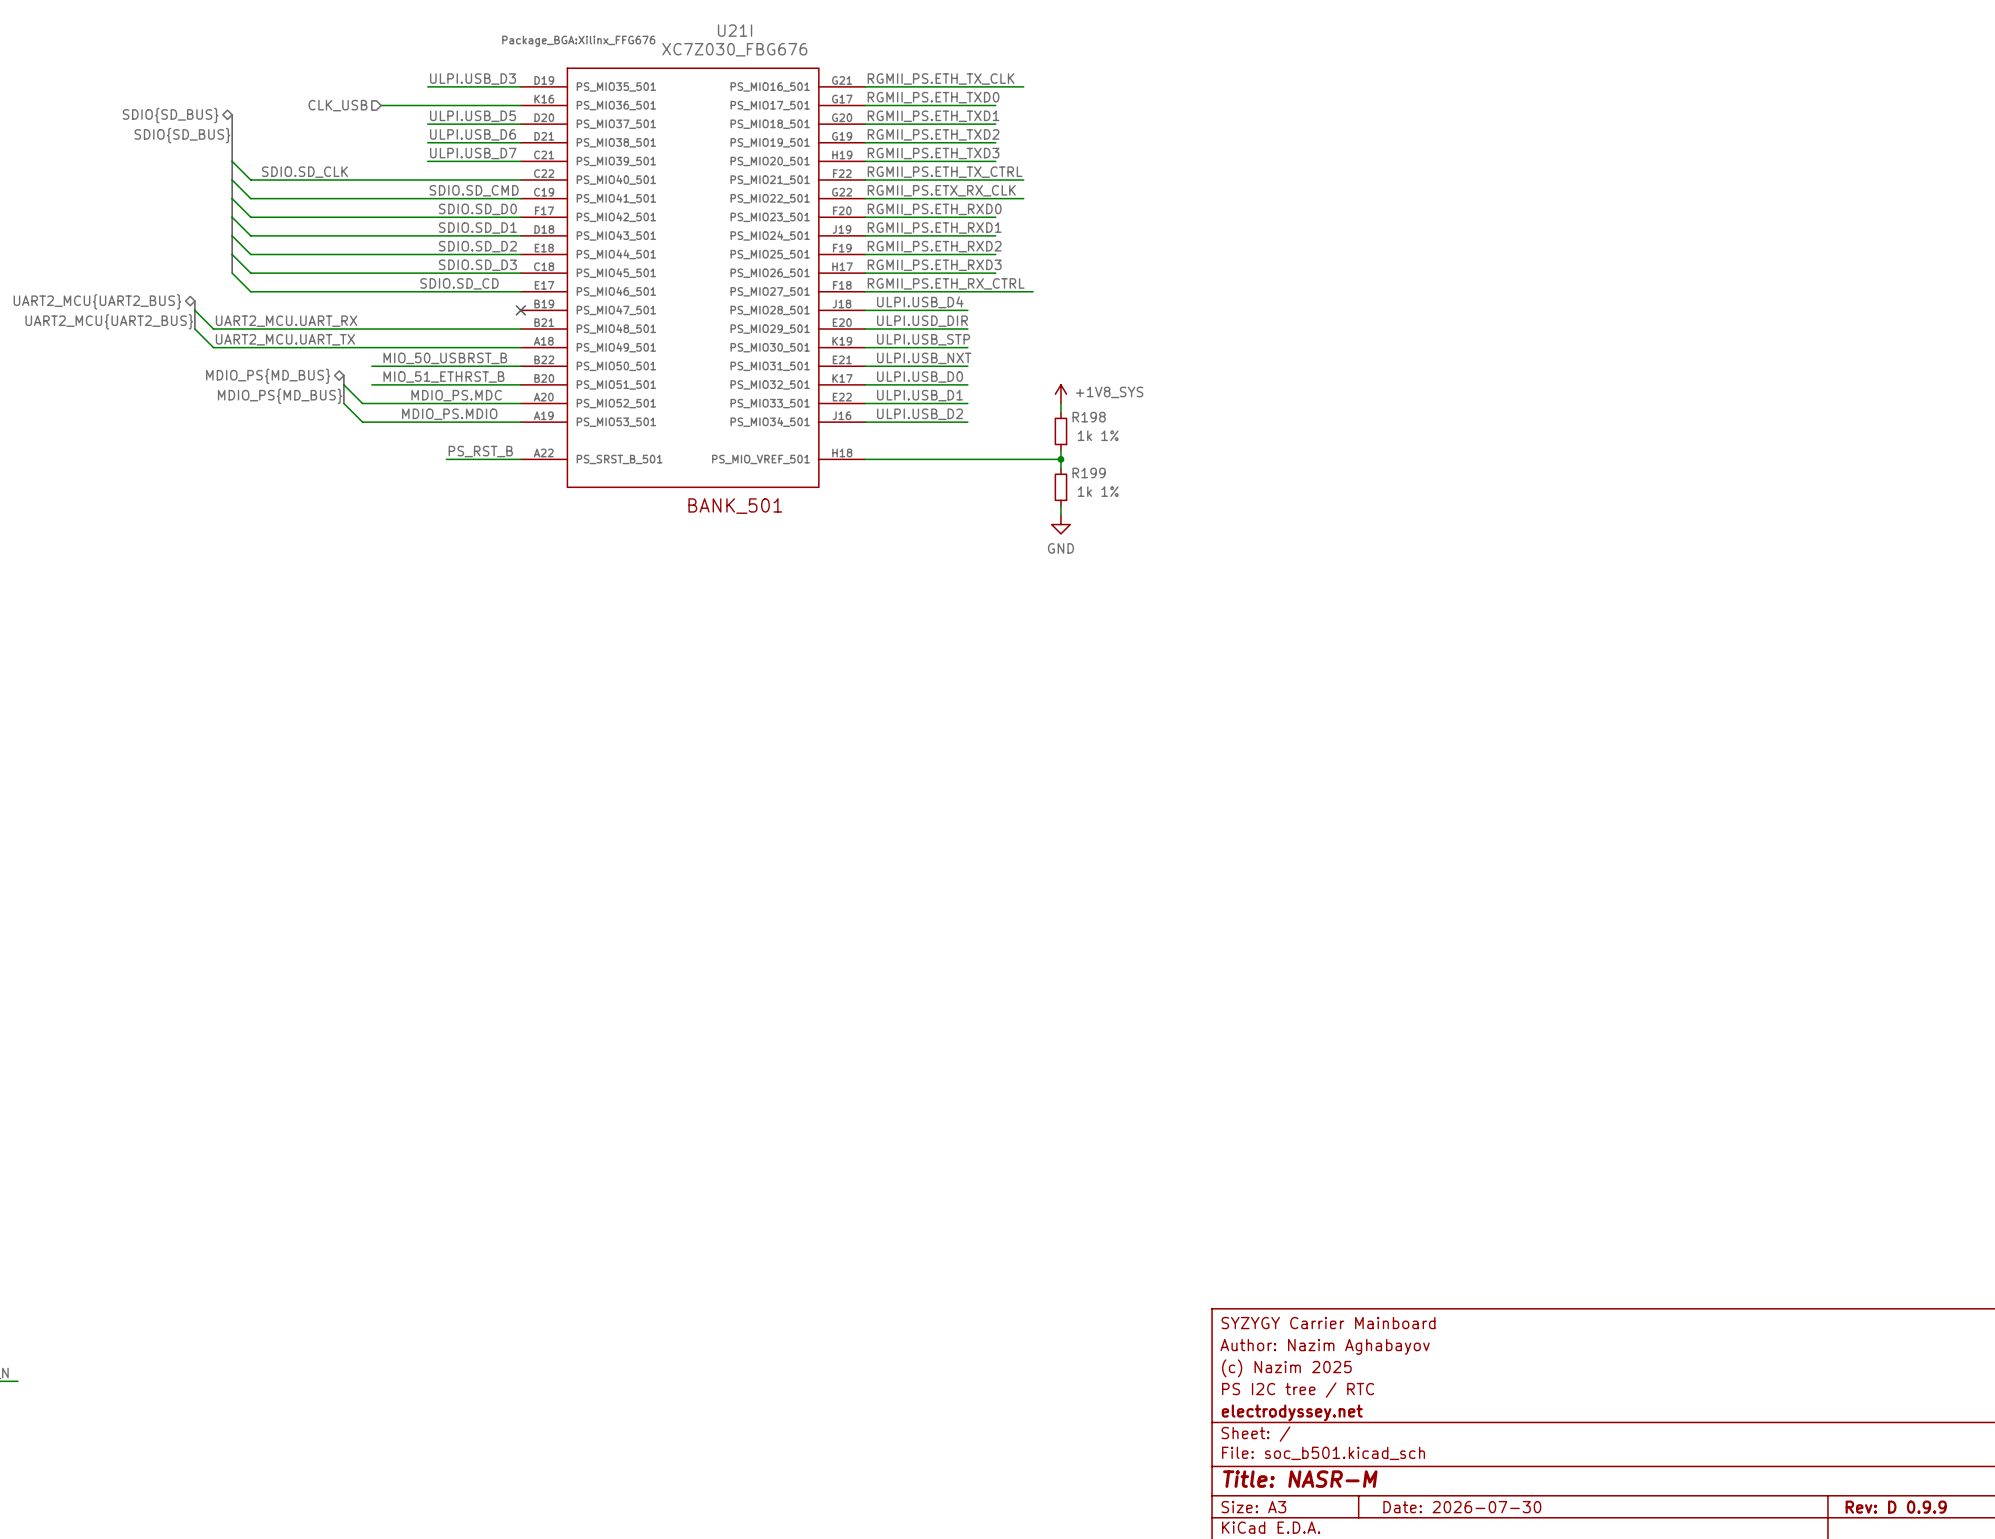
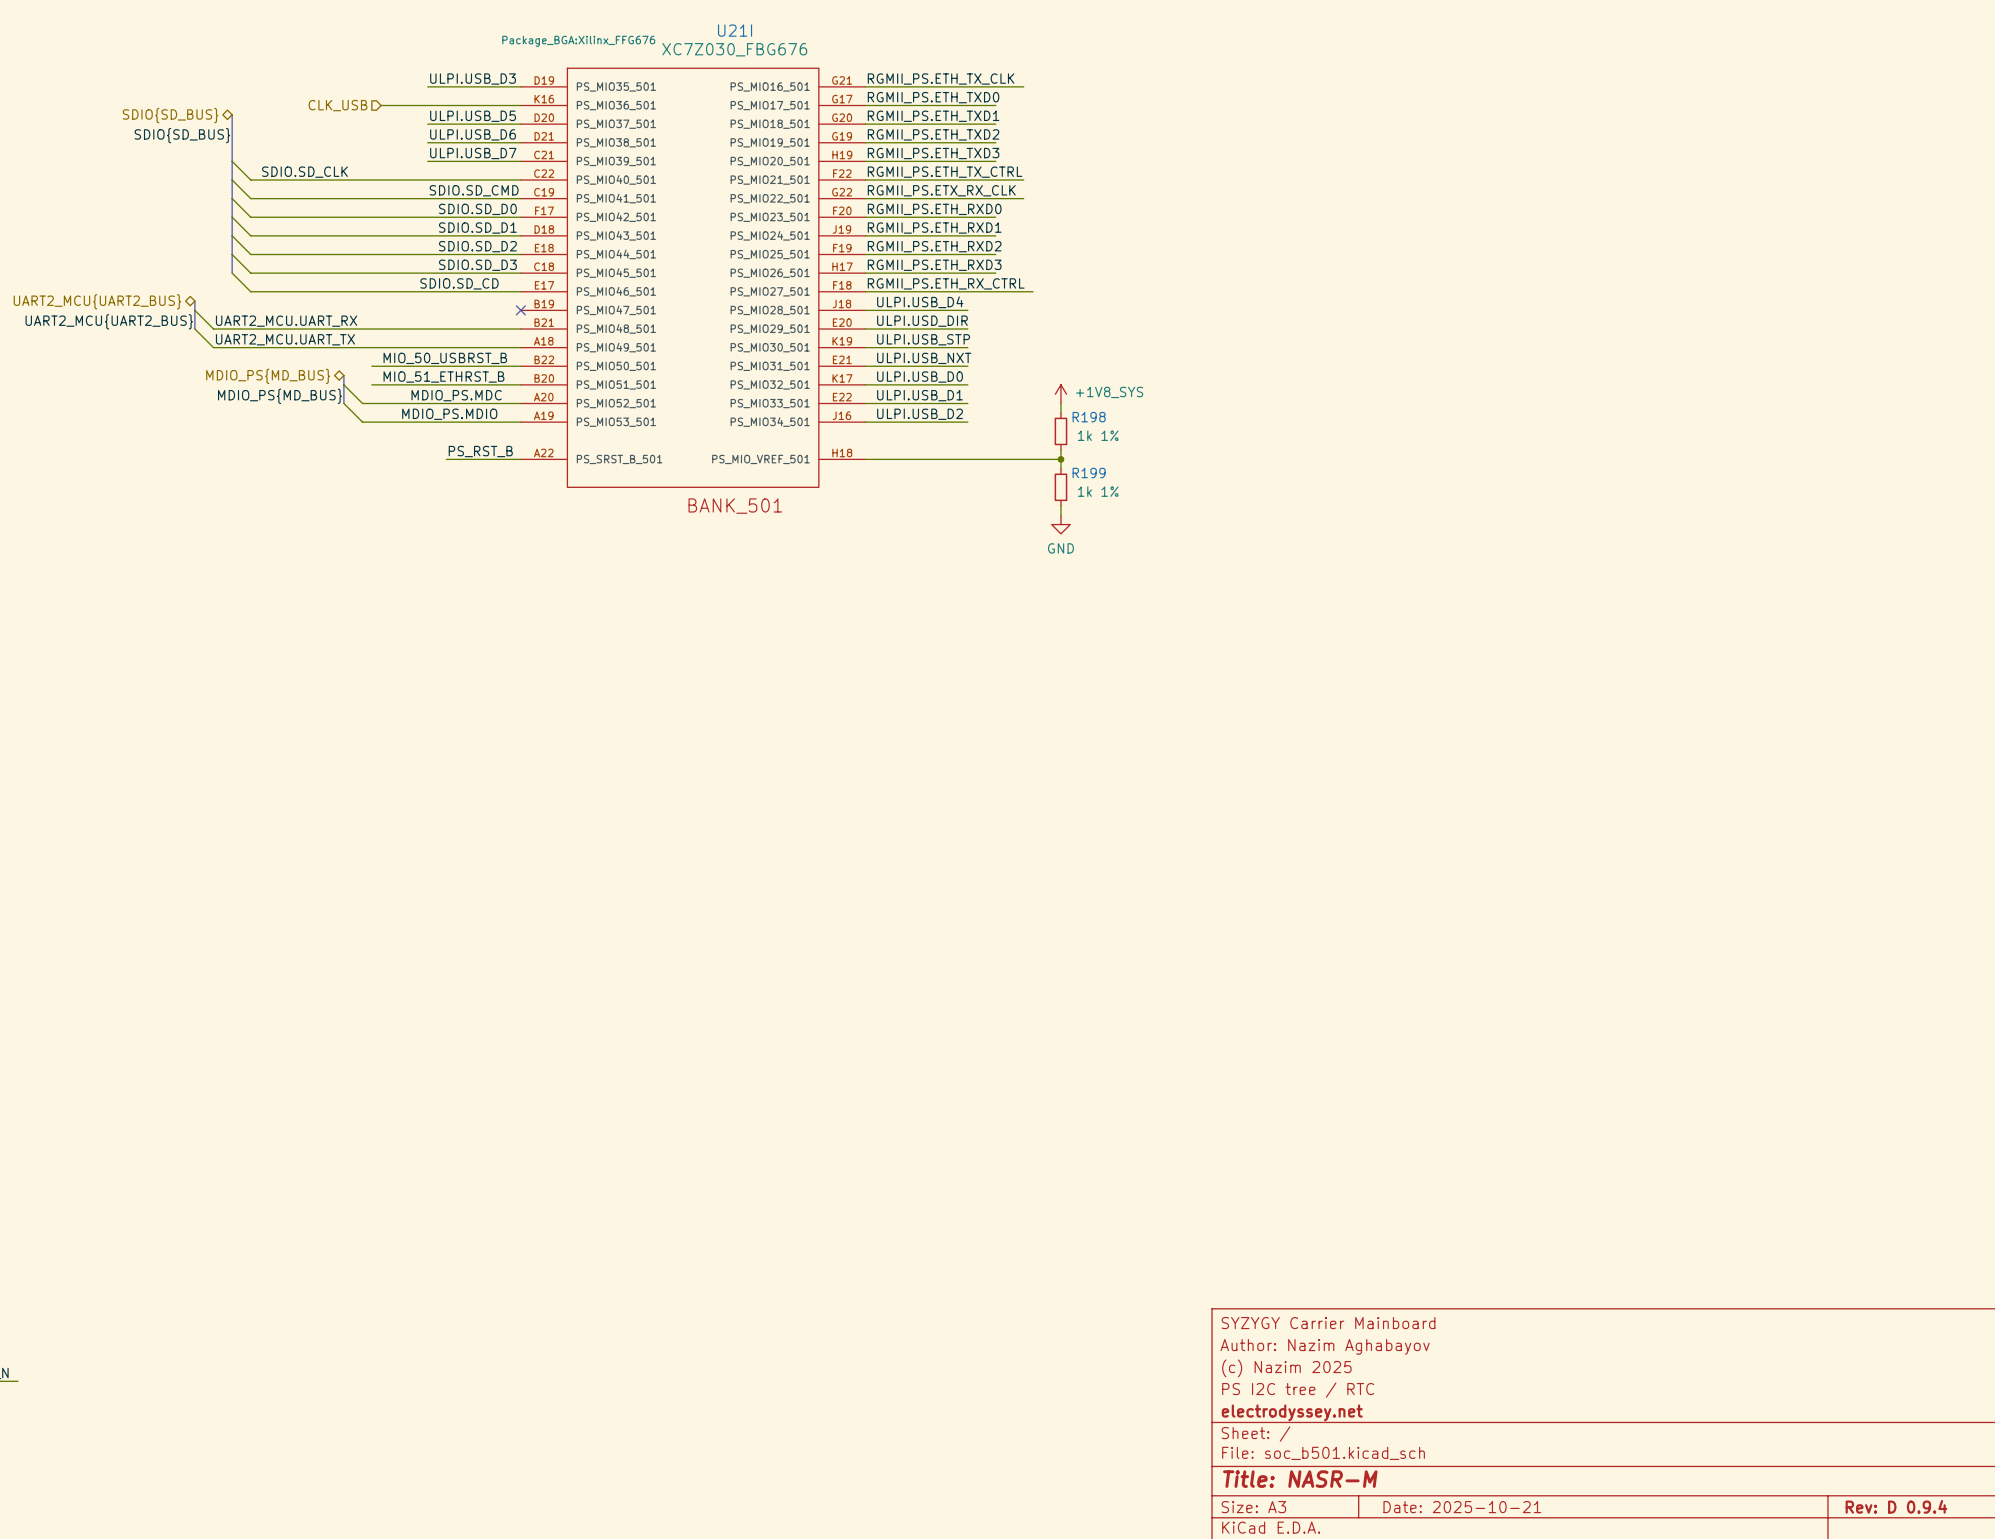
title block: Date: 2026-07-30 (1462, 1507) -> Date: 2025-10-21 (1462, 1507)
title block: Rev: D 0.9.9 (1896, 1507) -> Rev: D 0.9.4 (1896, 1506)

